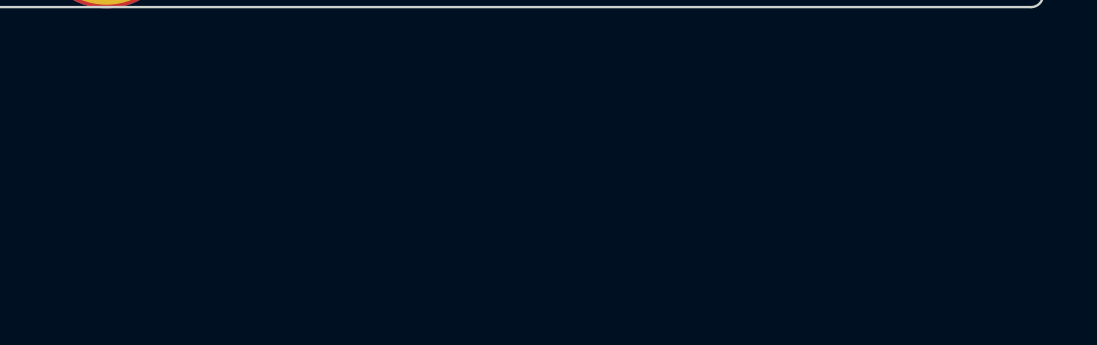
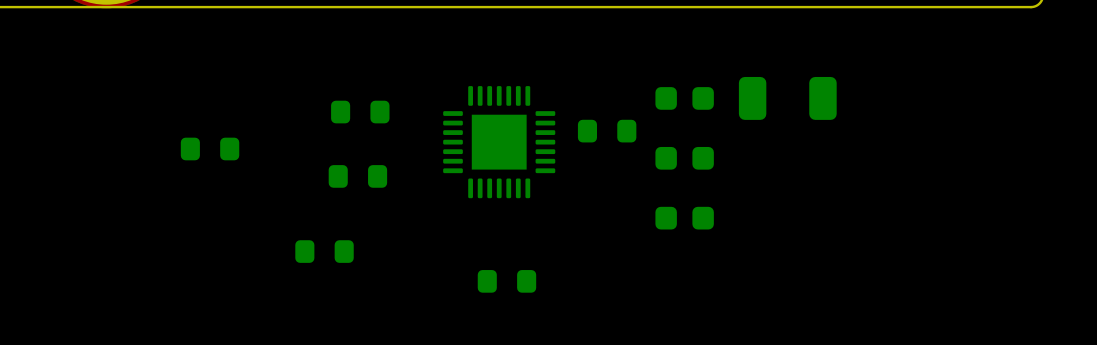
part: none -> (684, 98)
part: none -> (787, 98)
part: none -> (360, 112)
part: none -> (607, 131)
part: none -> (499, 142)
part: none -> (210, 149)
part: none -> (684, 158)
part: none -> (357, 176)
part: none -> (684, 218)
part: none -> (324, 251)
part: none -> (506, 281)

